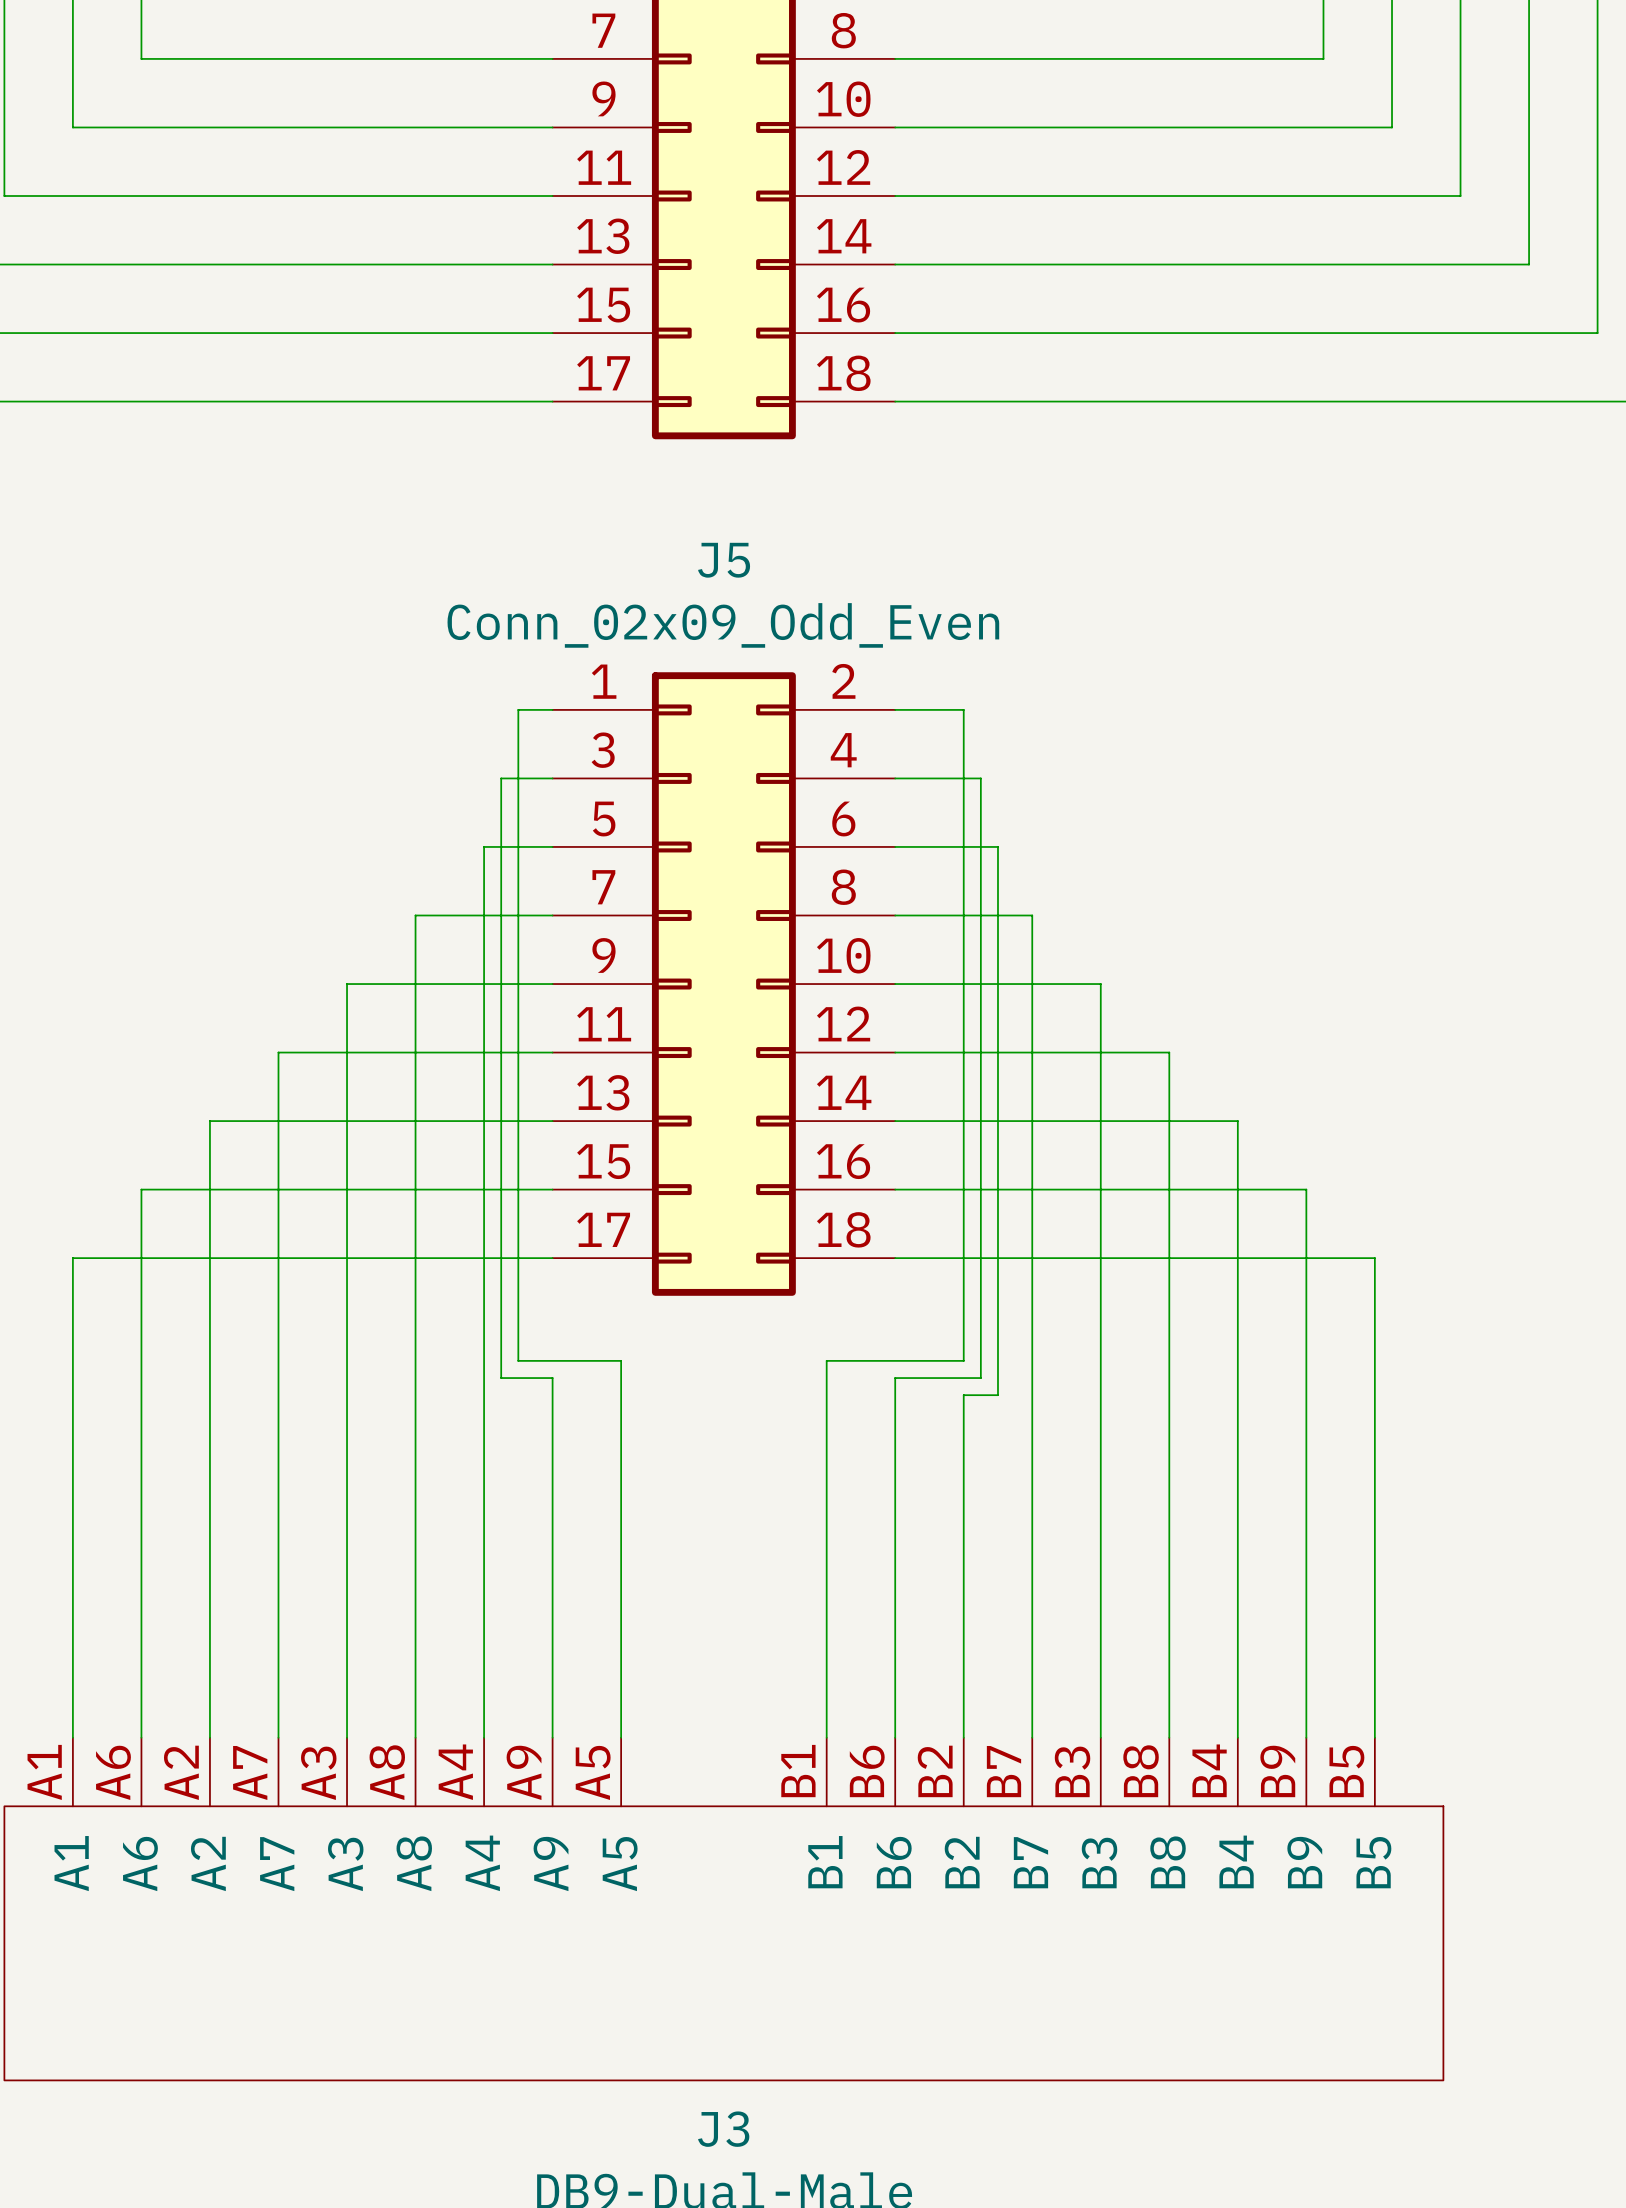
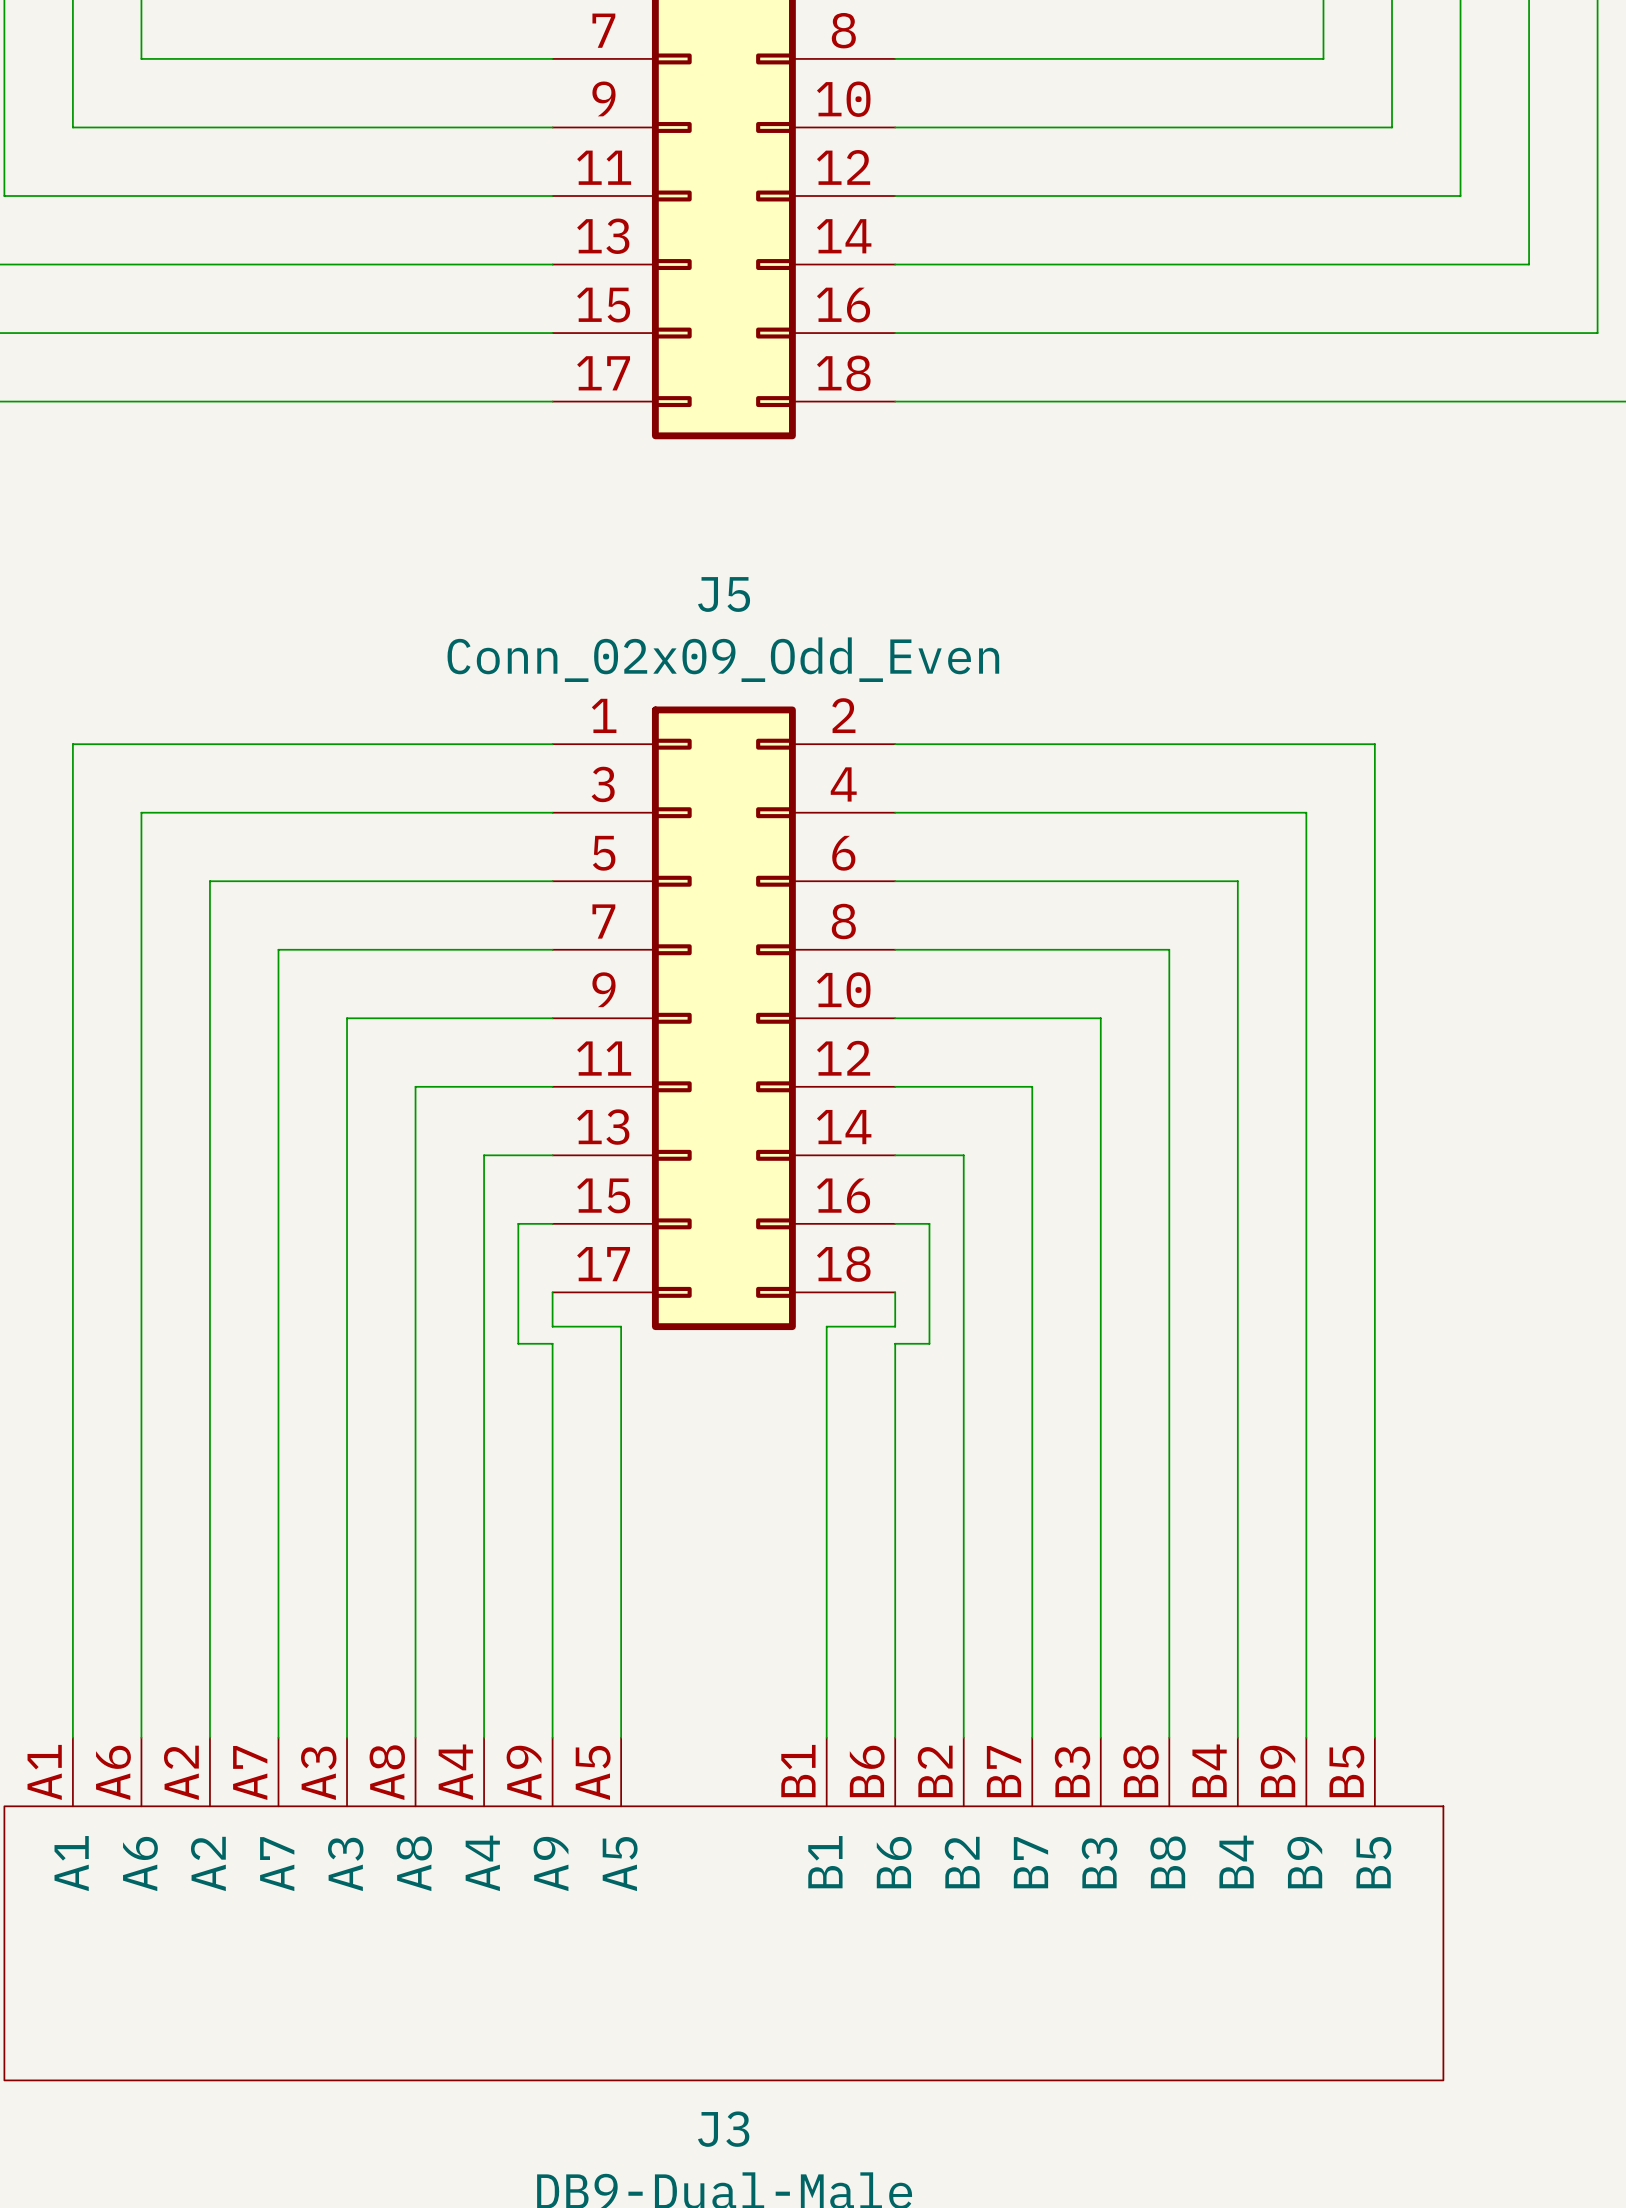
wire: (552, 709) (518, 709) (518, 1223) -> (552, 1223) (518, 1223)
wire: (895, 709) (963, 709) (963, 1155) -> (895, 1155) (963, 1155)
wire: (552, 778) (501, 778) (501, 1378) (552, 1378) -> (518, 1343) (552, 1343) (552, 1378)
wire: (895, 778) (980, 778) (980, 1378) (895, 1378) -> (895, 1223) (929, 1223) (929, 1343) (895, 1343) (895, 1378)
wire: (552, 846) (484, 846) (484, 1155) -> (552, 1155) (484, 1155)
wire: (895, 846) (997, 846) (997, 1395) (963, 1395) -> (963, 1360) (963, 1395)
wire: (552, 915) (415, 915) (415, 1086) -> (552, 1086) (415, 1086)
wire: (895, 915) (1032, 915) (1032, 1086) -> (895, 1086) (1032, 1086)
wire: (552, 984) (347, 984) (347, 1018) -> (552, 1018) (347, 1018)
J5 position: (723, 984) -> (723, 1018)
wire: (895, 984) (1100, 984) (1100, 1018) -> (895, 1018) (1100, 1018)
wire: (278, 1052) (552, 1052) -> (278, 1052) (278, 949) (552, 949)
wire: (895, 1052) (1169, 1052) -> (895, 949) (1169, 949) (1169, 1052)
wire: (209, 1121) (552, 1121) -> (209, 1121) (209, 881) (552, 881)
wire: (895, 1121) (1237, 1121) -> (895, 881) (1237, 881) (1237, 1121)
wire: (141, 1189) (552, 1189) -> (141, 1189) (141, 812) (552, 812)
wire: (895, 1189) (1306, 1189) -> (895, 812) (1306, 812) (1306, 1189)
wire: (72, 1258) (552, 1258) -> (72, 1258) (72, 744) (552, 744)
wire: (895, 1258) (1374, 1258) -> (895, 744) (1374, 744) (1374, 1258)
wire: (518, 1343) (518, 1360) (621, 1360) -> (552, 1292) (552, 1326) (621, 1326) (621, 1360)
wire: (826, 1360) (963, 1360) -> (826, 1360) (826, 1326) (895, 1326) (895, 1292)

